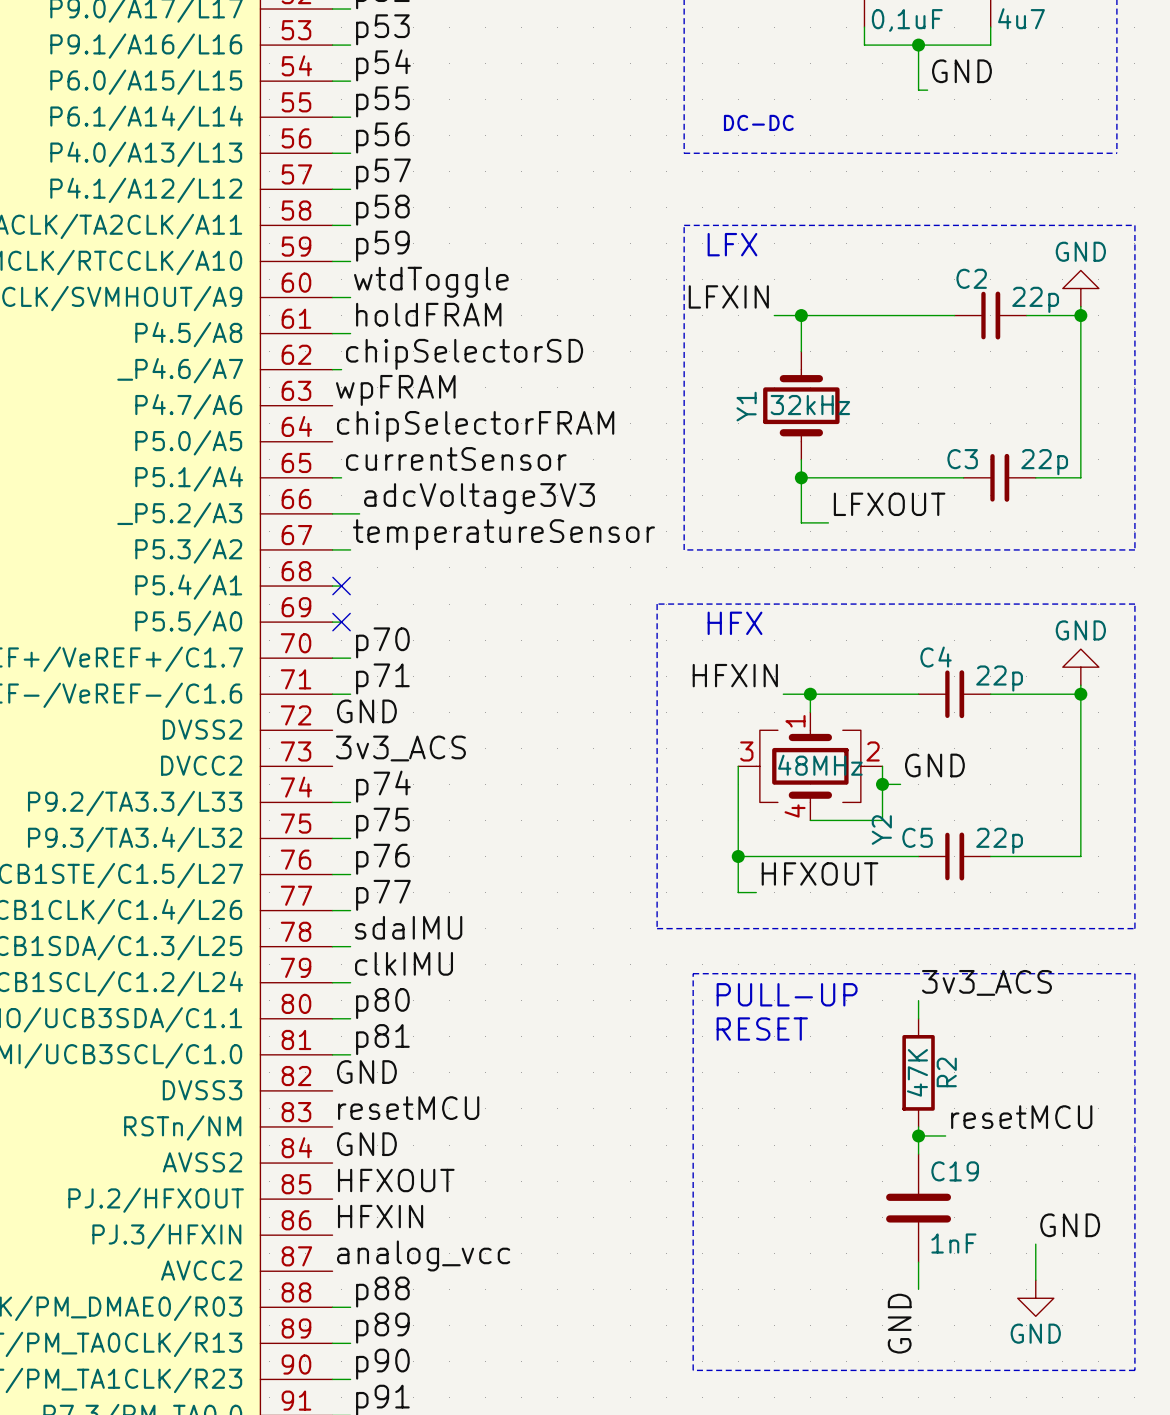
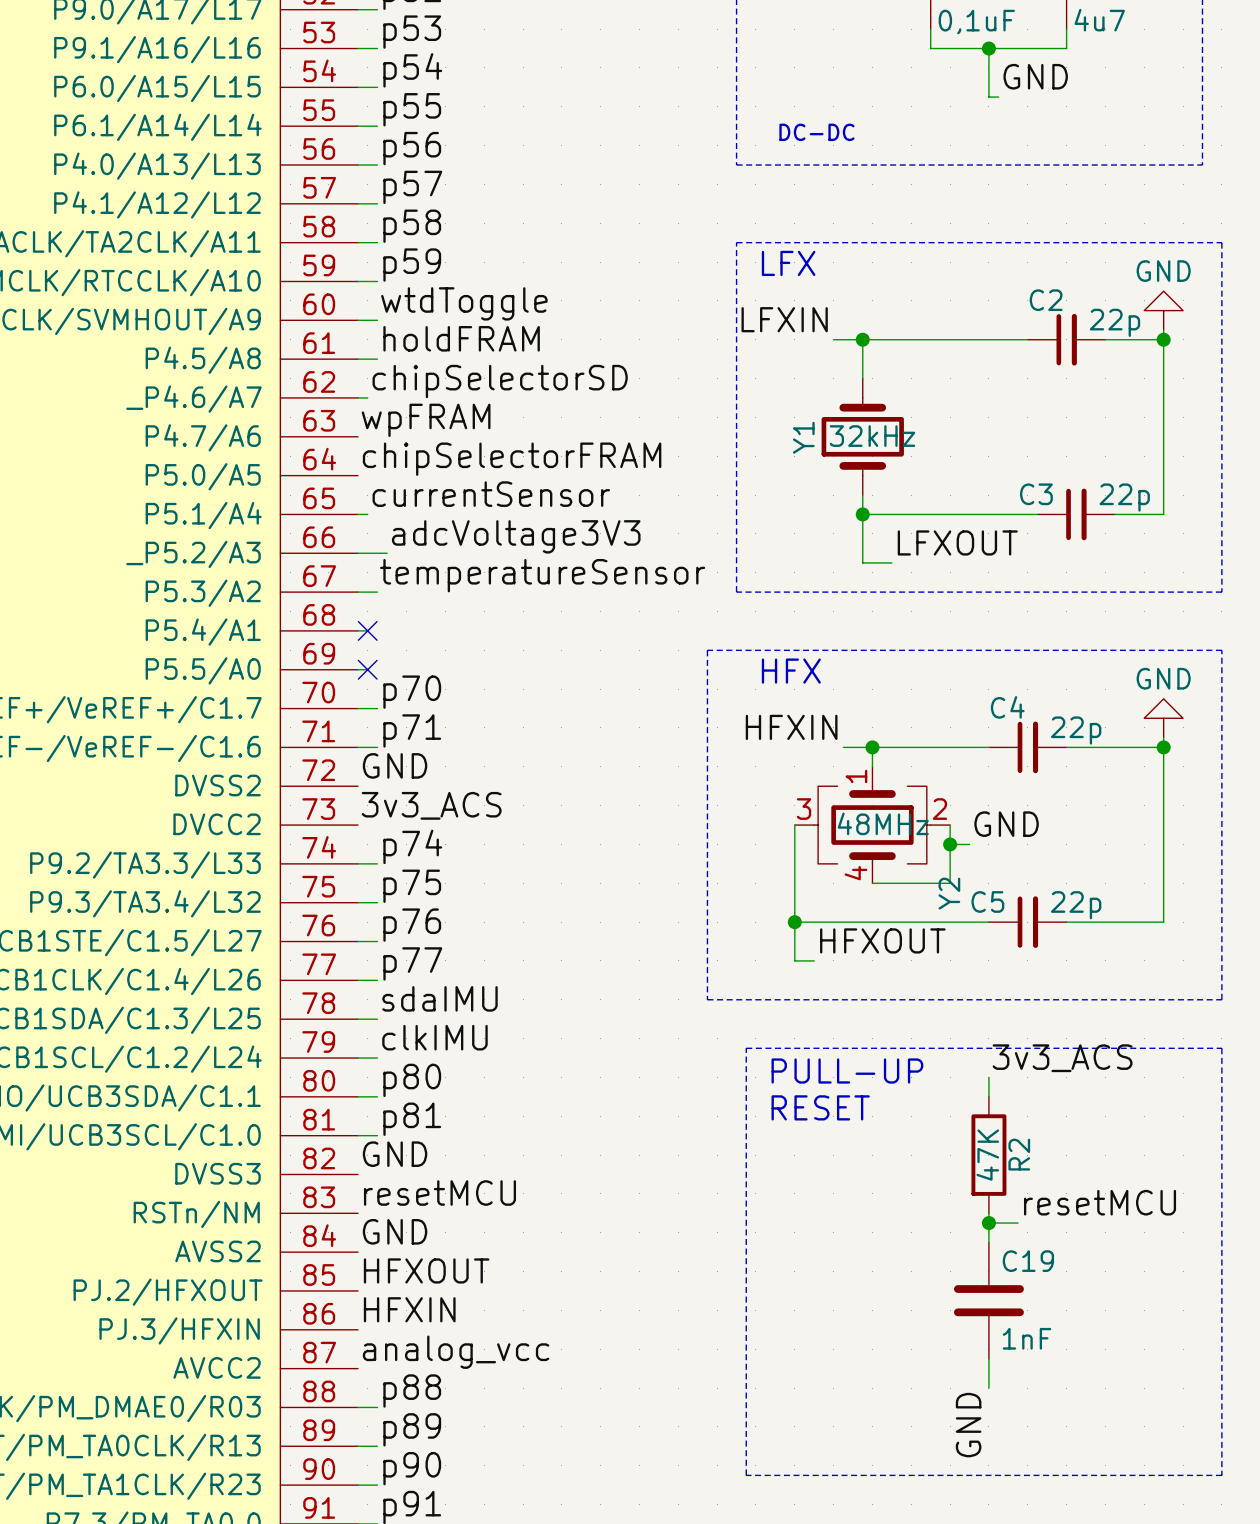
label: GND (1070, 1225) -> none
wire: (1035, 1244) (1035, 1280) -> none
power symbol: GND (1035, 1298) -> none

